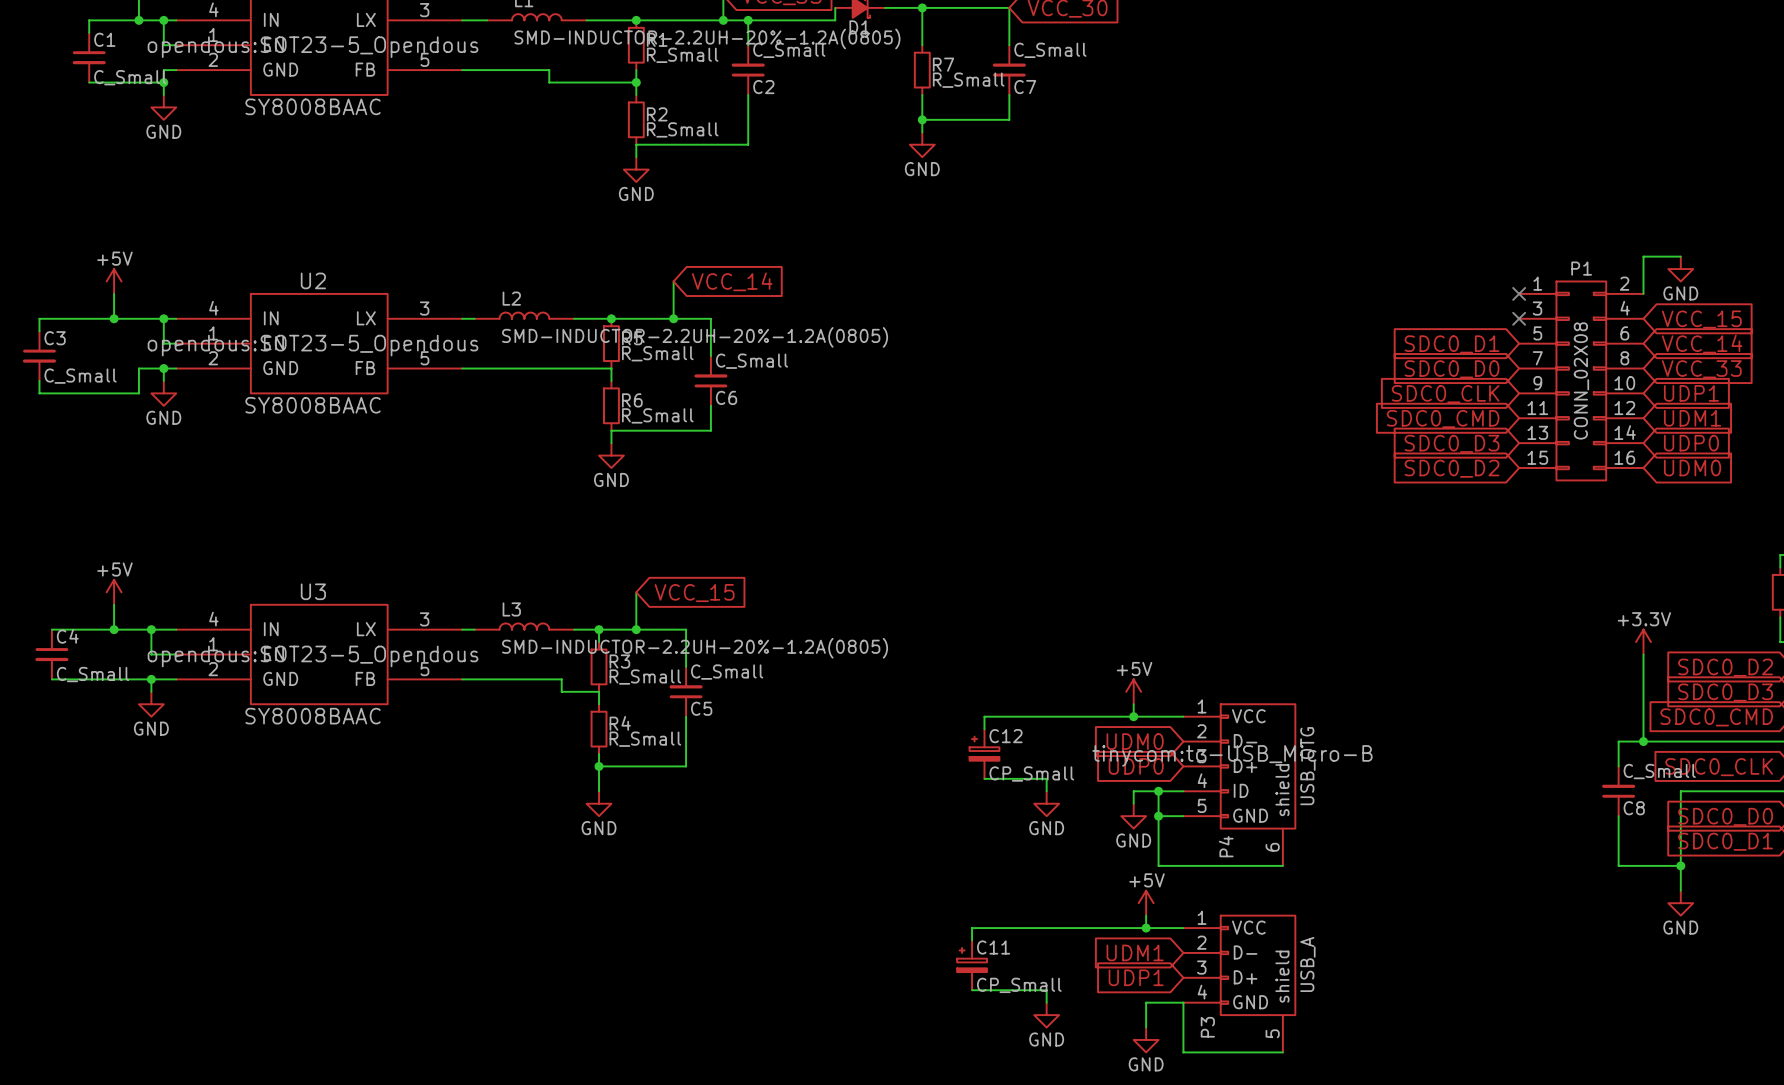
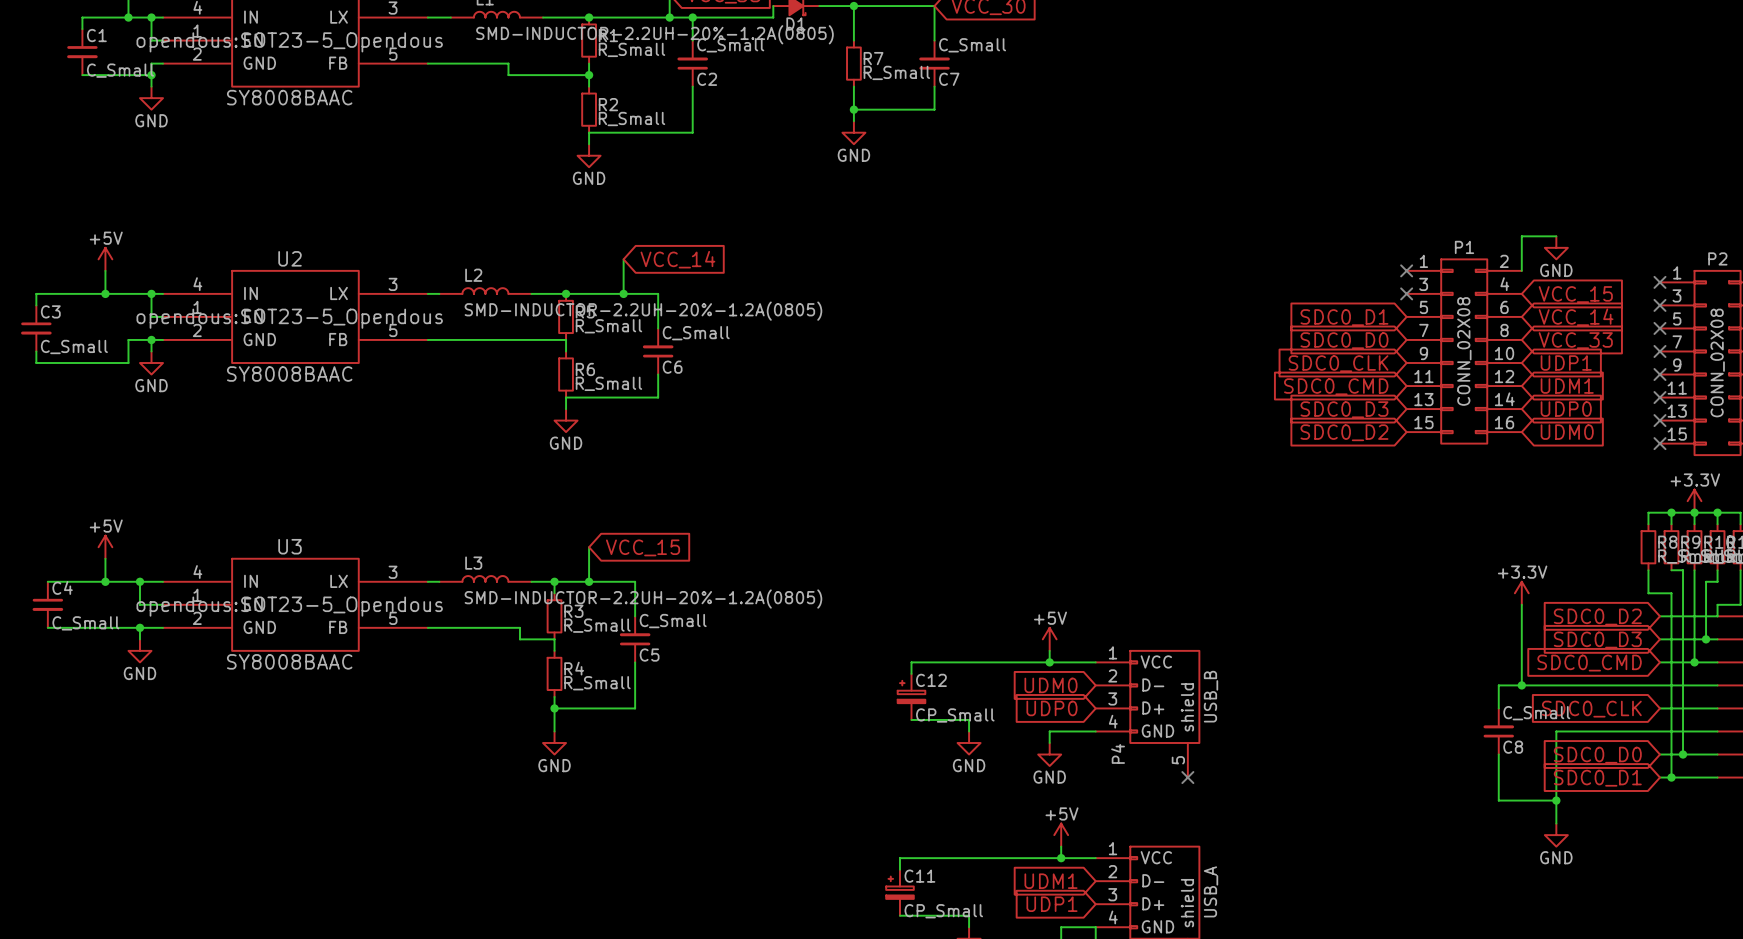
P4 symbol: [1183, 704, 1296, 866] -> [1095, 650, 1200, 778]
P4 text: tinycom:tc-USB_Micro-B (1232, 755) -> none
P4 value: USB_OTG (1307, 766) -> USB_B (1211, 696)
wire: (1158, 791) (1158, 865) (1282, 865) -> none
junction: (1158, 791) -> none
wire: (1158, 816) (1183, 816) -> none
junction: (1158, 816) -> none
no-connect mark: none -> (1187, 777)
P4 name position: P4 (1226, 846) -> P4 (1118, 753)

